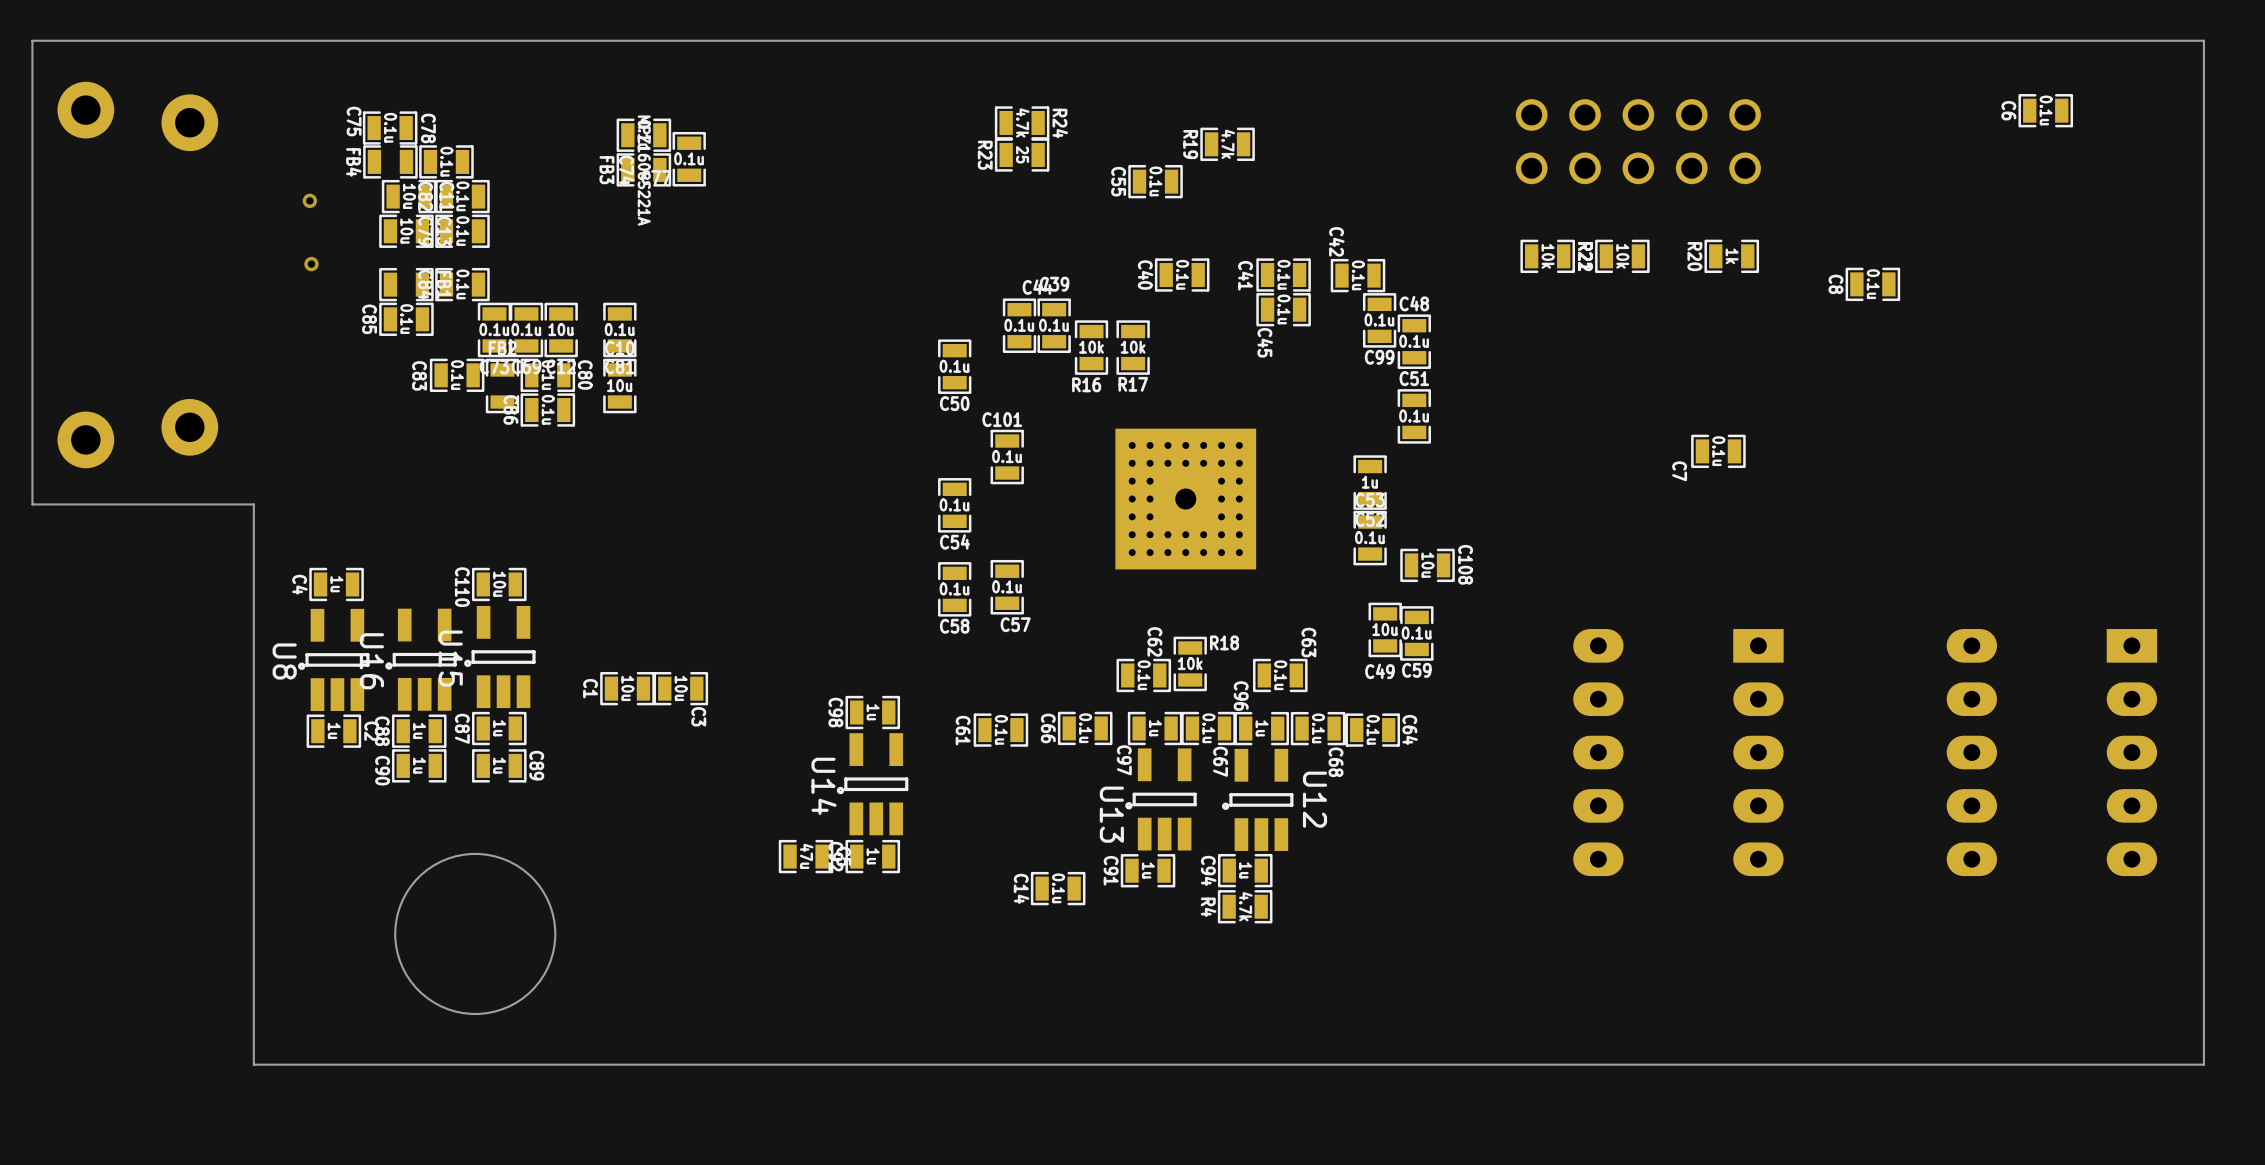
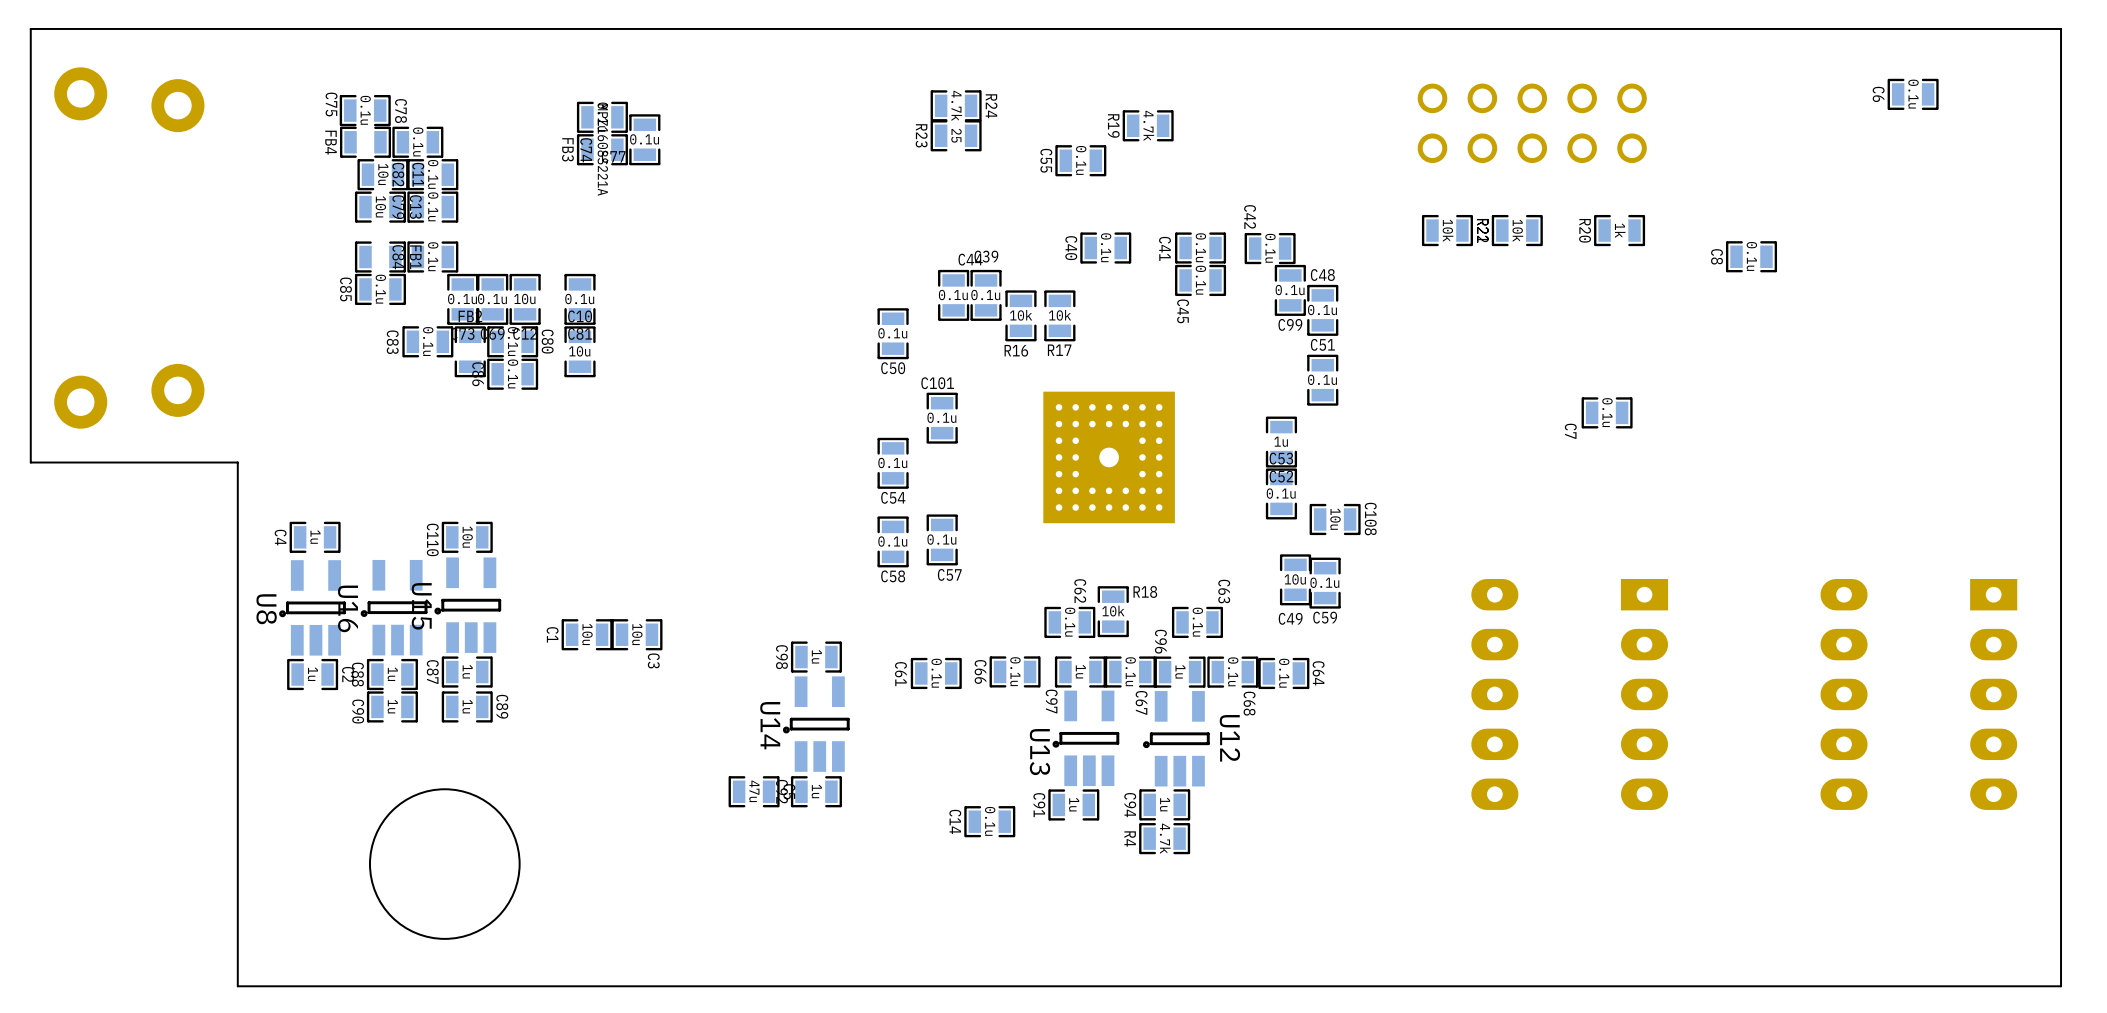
via: (309, 200) -> none
via: (311, 264) -> none

